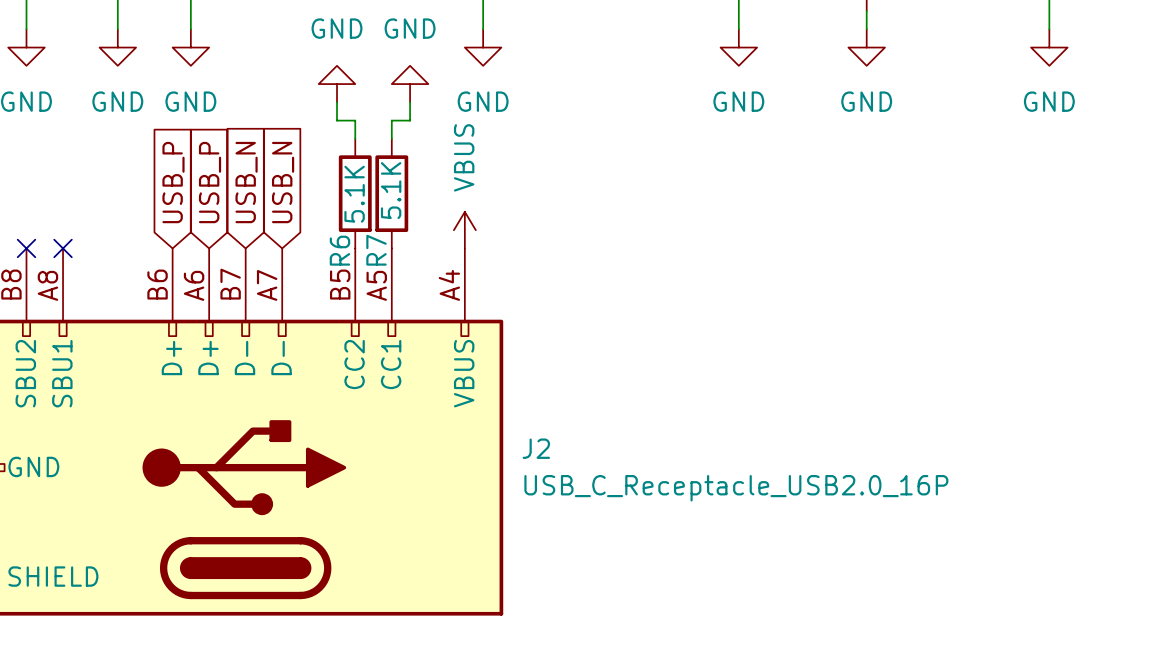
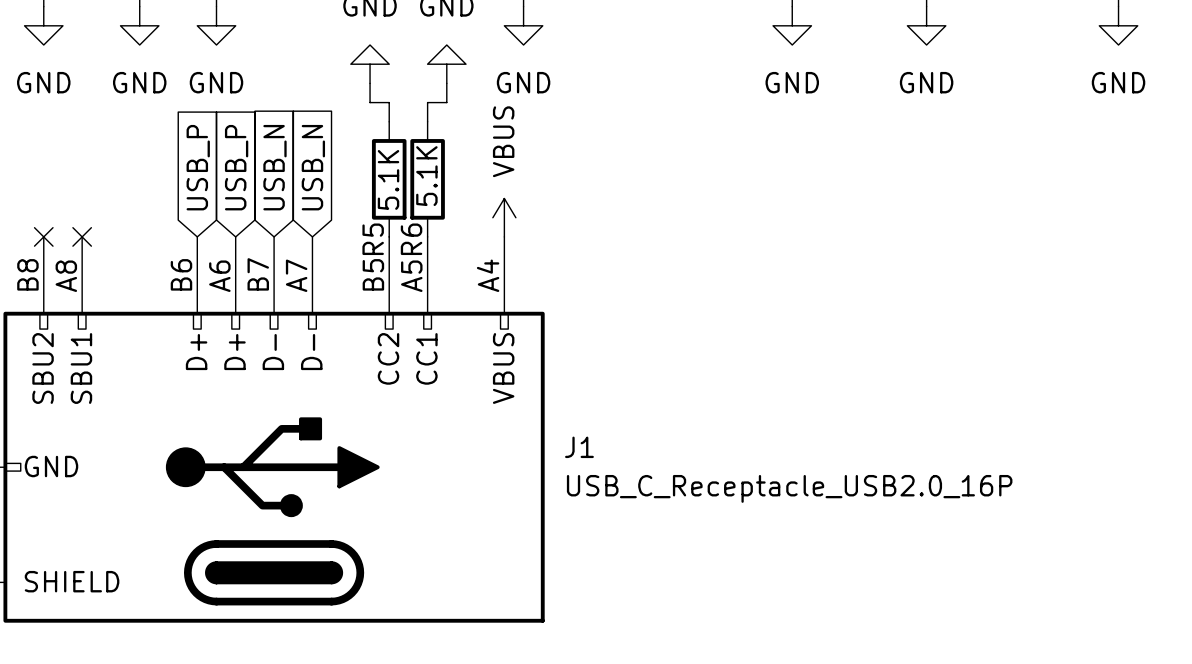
R6 name: R6 (339, 250) -> R5 (373, 239)
R7 name: R7 (376, 250) -> R6 (411, 239)
J2 name: J2 (536, 448) -> J1 (579, 447)

